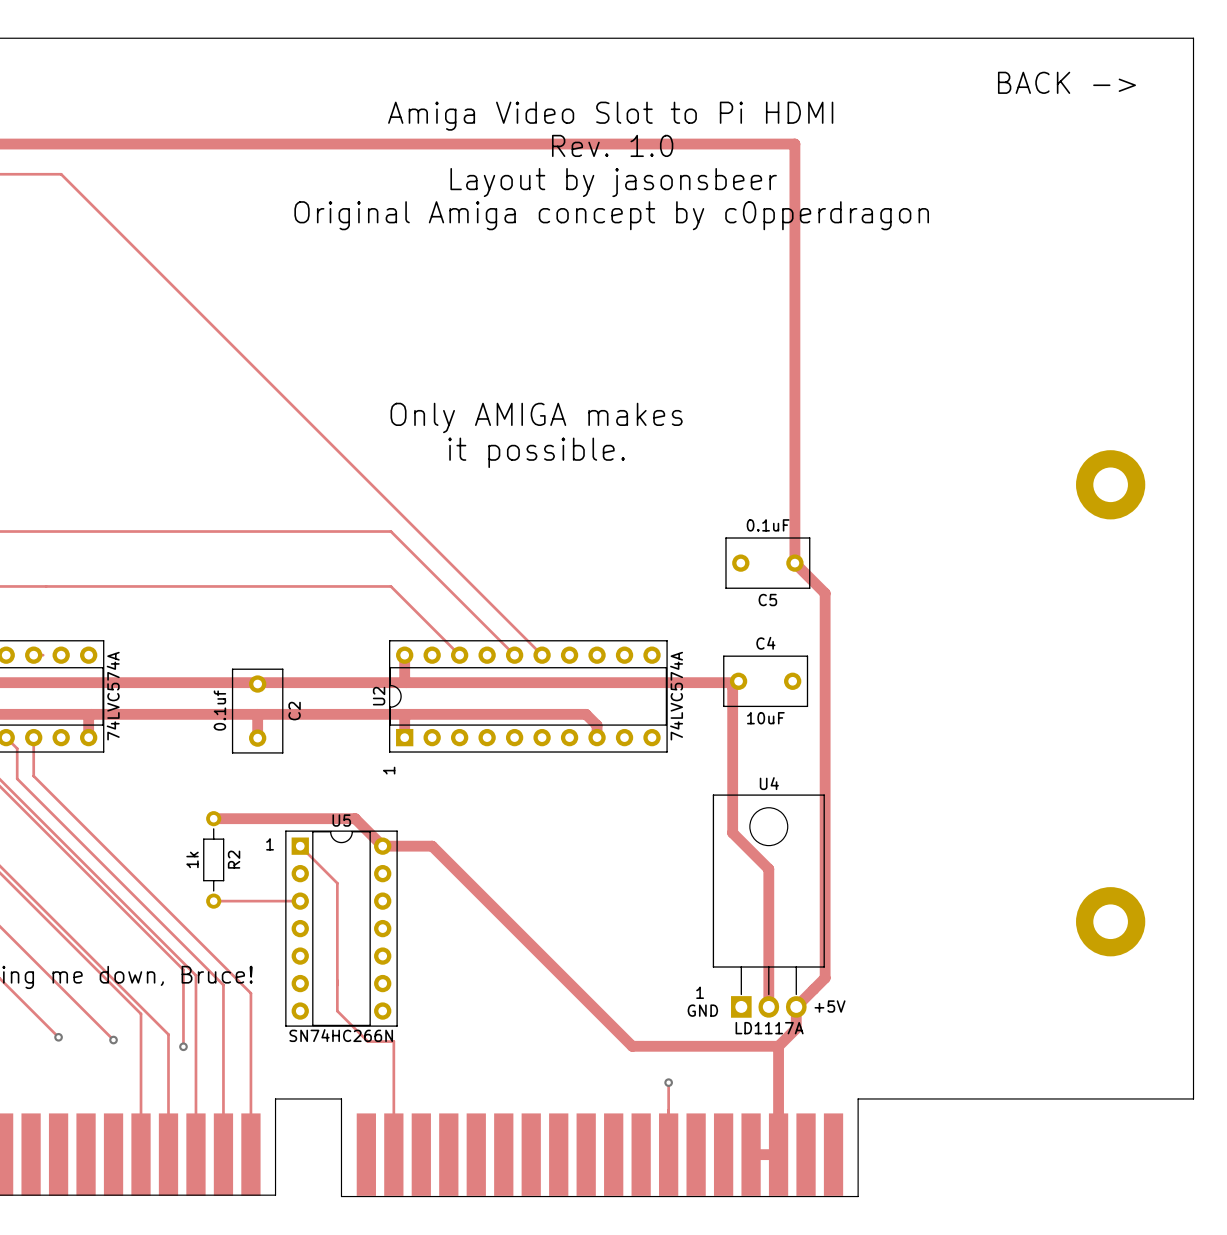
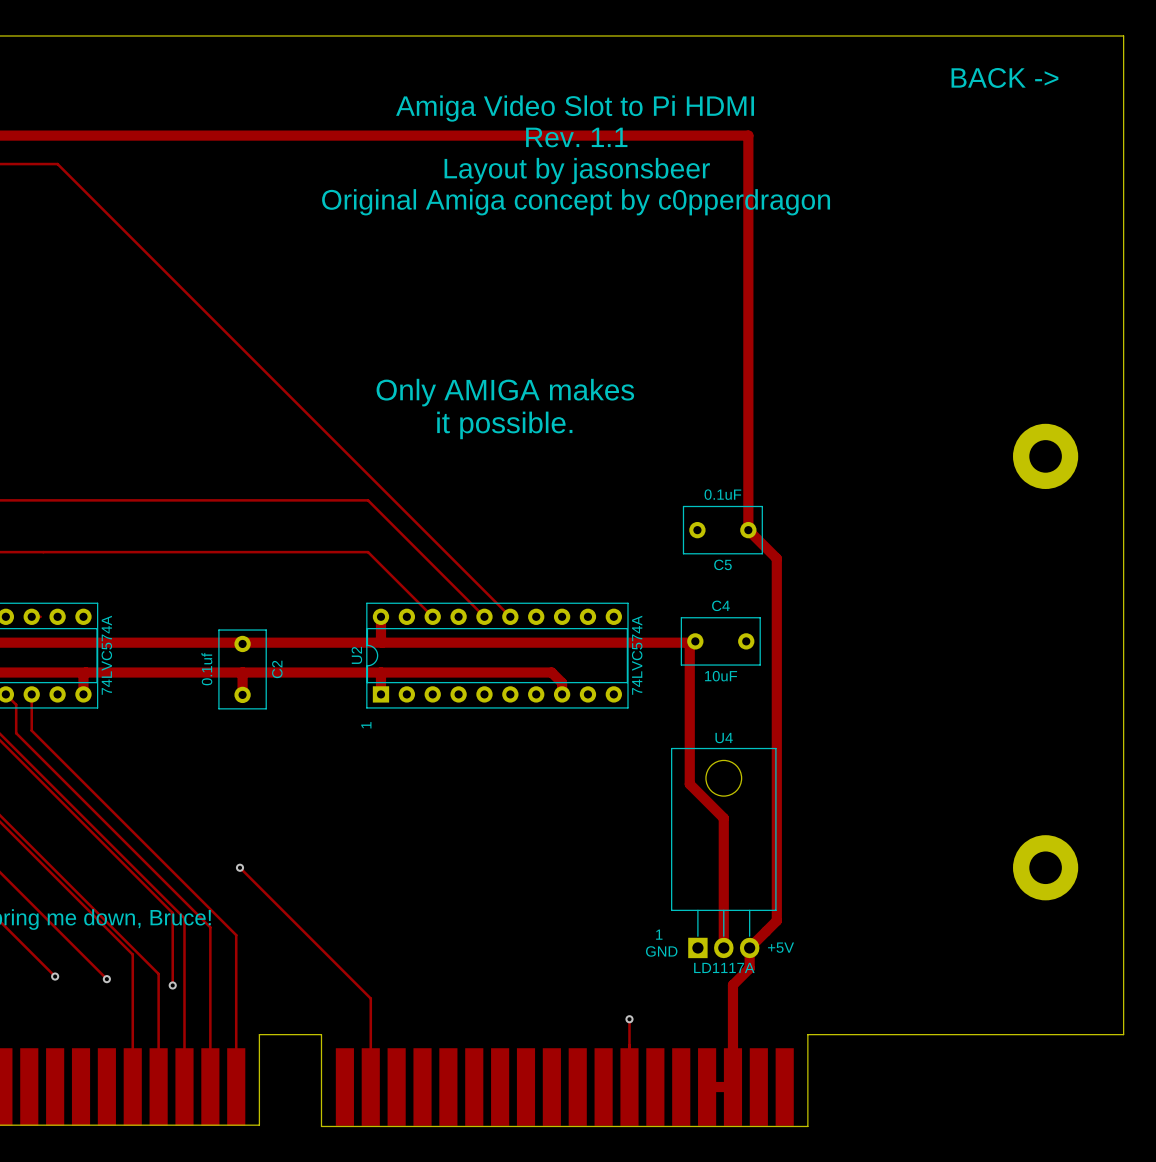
text: Rev. 1.0 (612, 145) -> Rev. 1.1 (576, 137)
track: (213, 818) (355, 818) (382, 846) (432, 846) (632, 1046) (778, 1046) -> none
text: 1 (270, 844) -> none
track: (300, 846) (337, 883) (337, 1011) (367, 1041) (393, 1041) (393, 1060) -> (239, 867) (370, 998)
R2: 1k (213, 859) -> none
track: (213, 901) (300, 901) -> none
via: none -> (239, 867)
U5: SN74HC266N (341, 928) -> none

